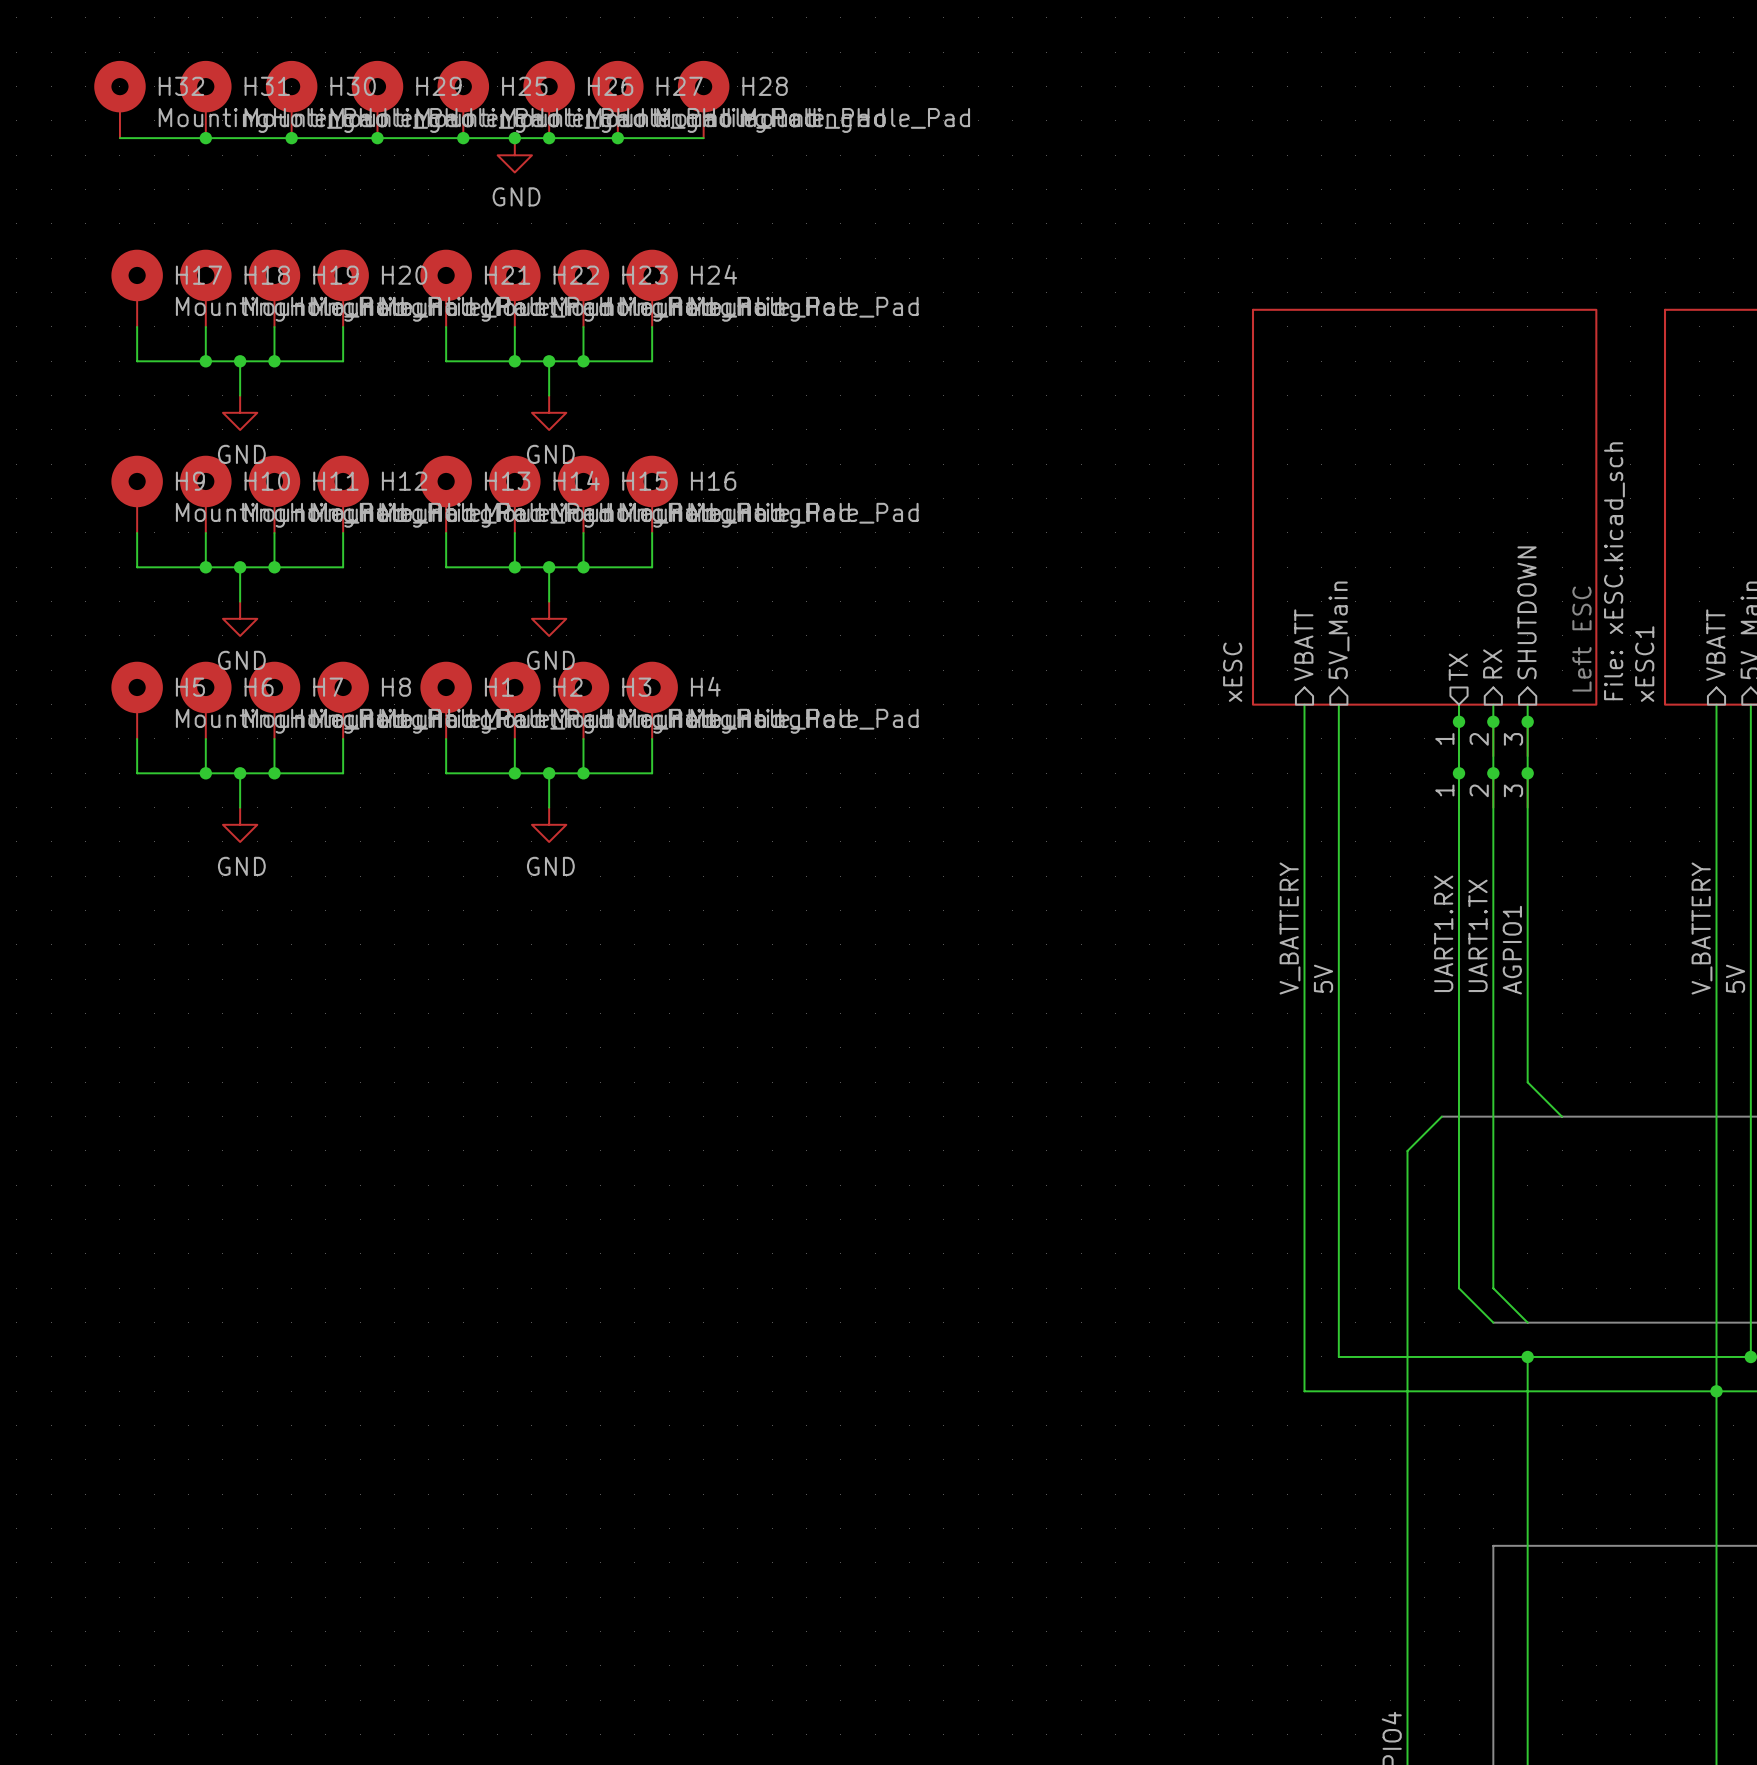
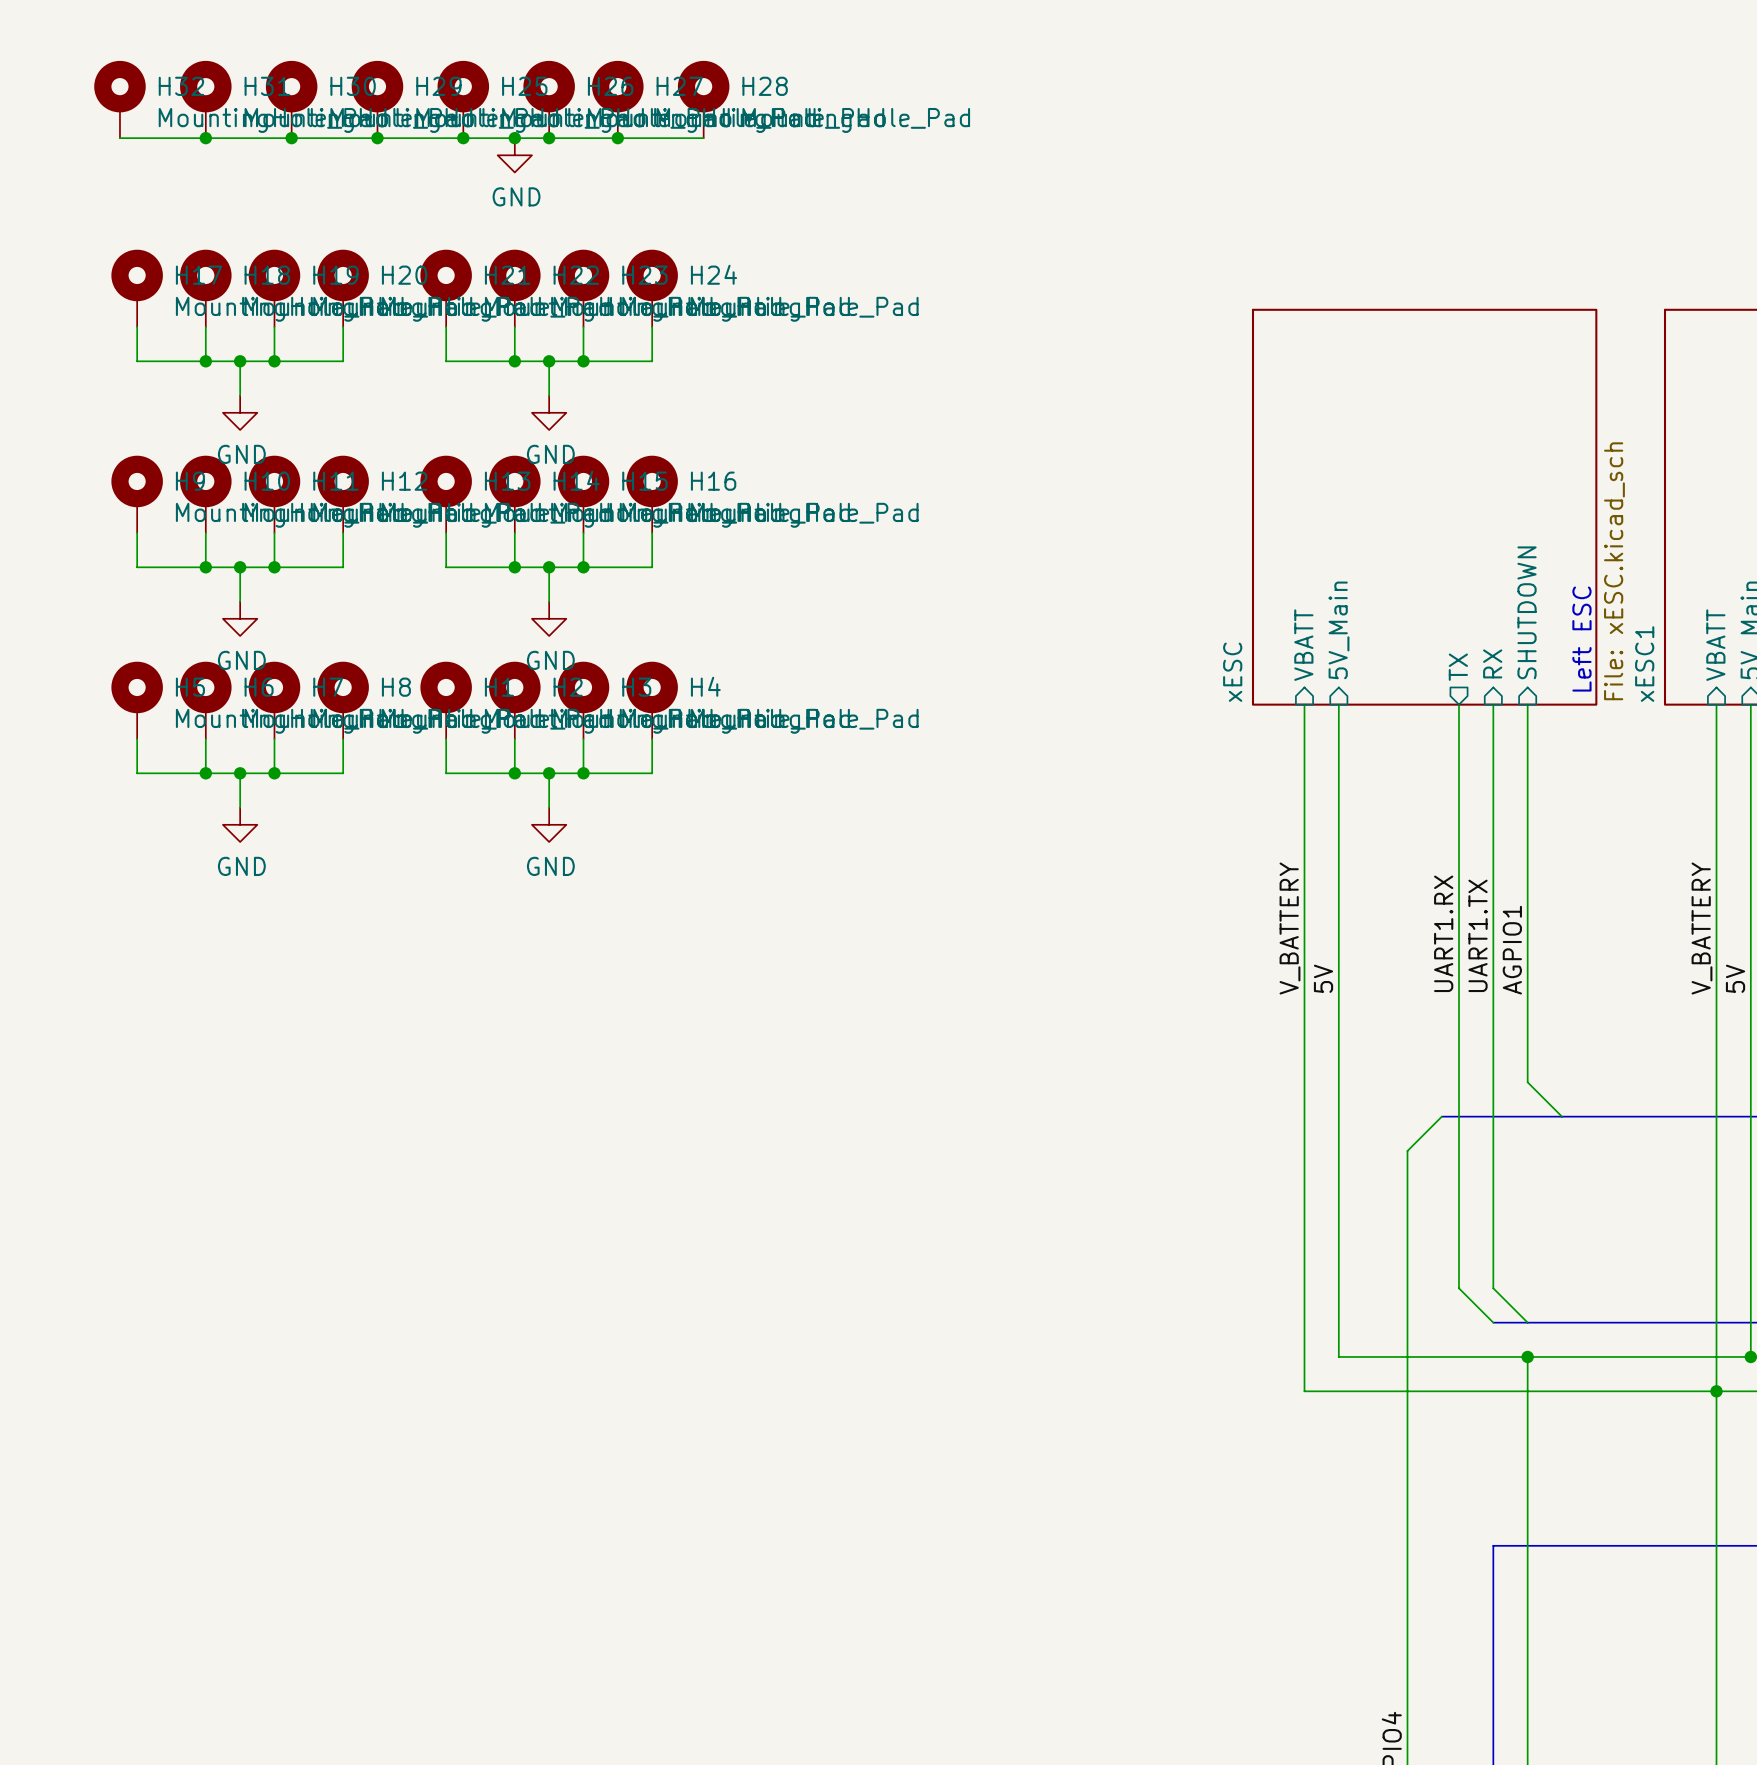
junction: (1459, 721) -> none
junction: (1493, 721) -> none
junction: (1527, 721) -> none
part: (1493, 738) -> none
junction: (1459, 773) -> none
junction: (1493, 773) -> none
junction: (1527, 773) -> none
part: (1493, 790) -> none

